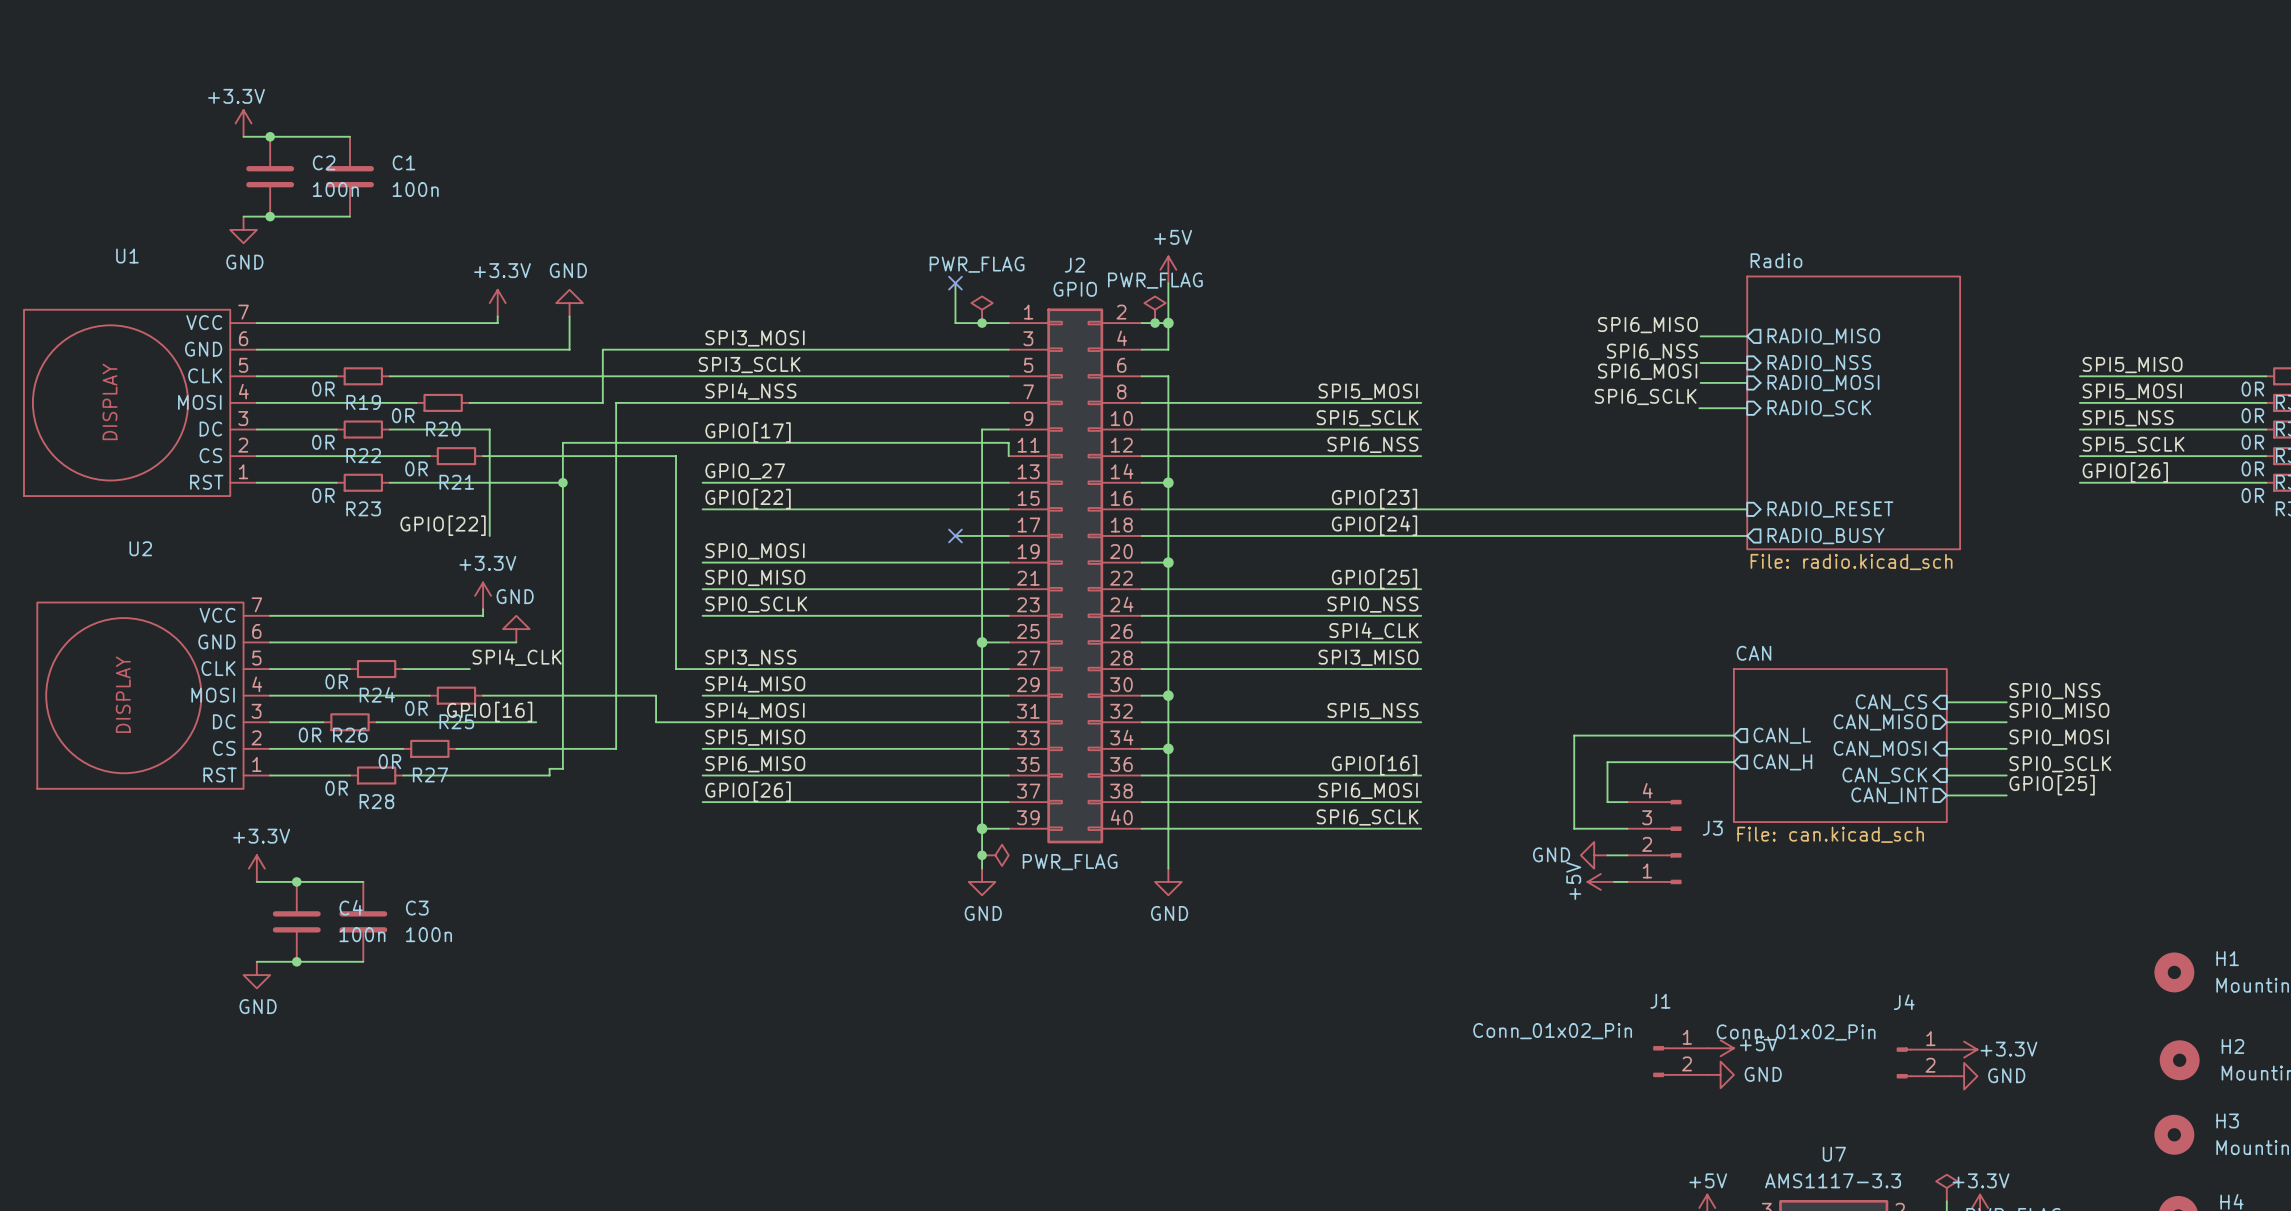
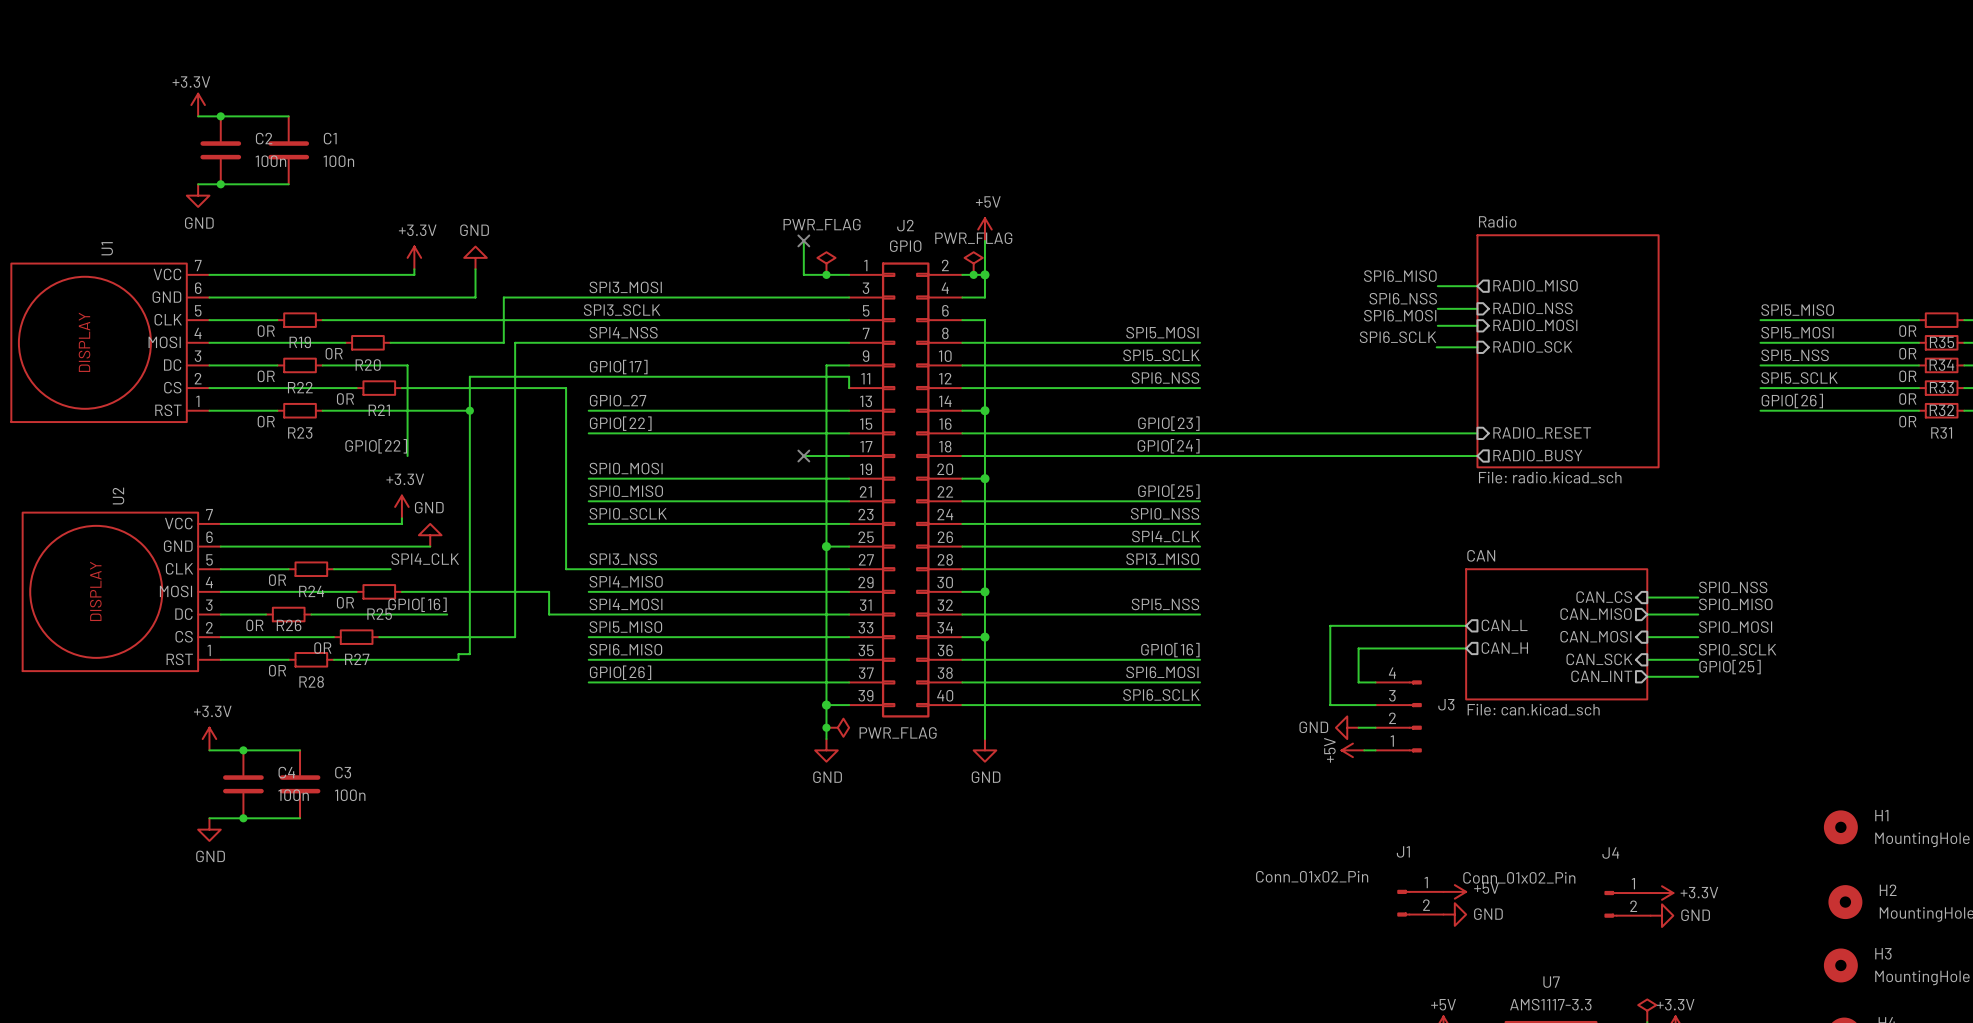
U1 name rotation: 0° (127, 256) -> 90° counterclockwise (107, 248)
U2 name rotation: 0° (140, 548) -> 90° counterclockwise (118, 496)

